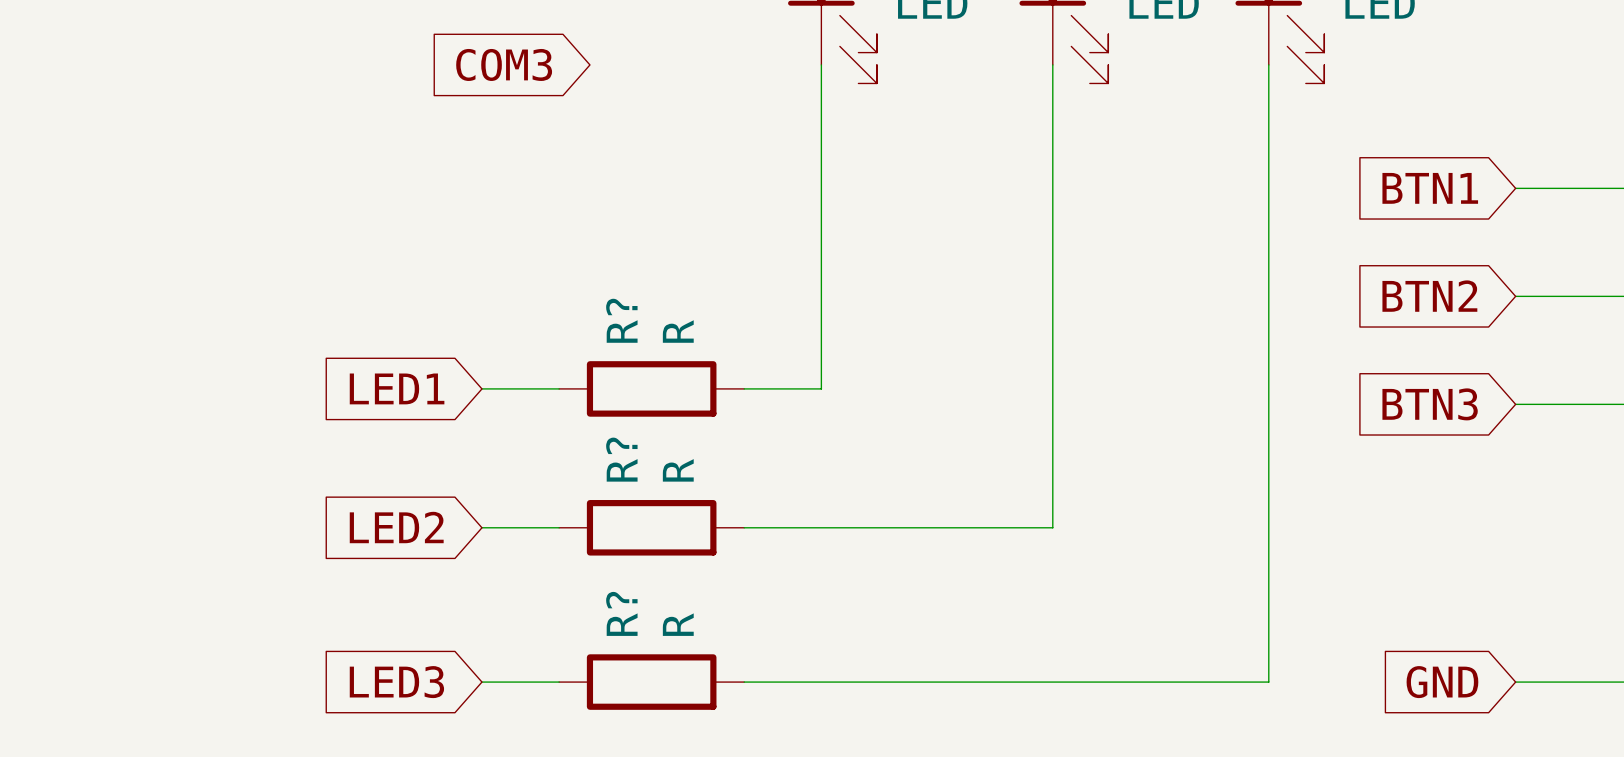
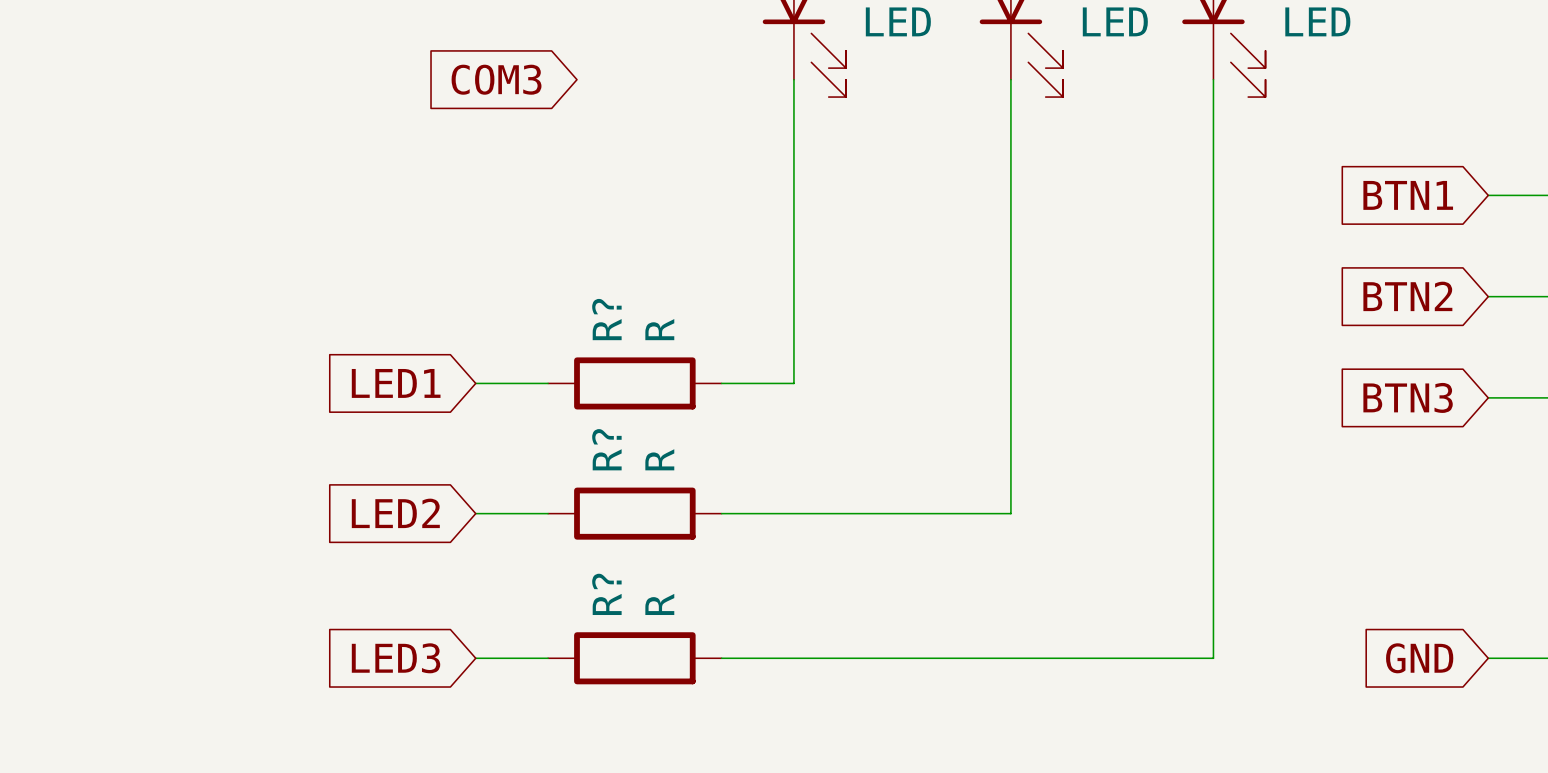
global label position: BTN1 (1430, 188) -> BTN1 (1408, 195)
wire: (1515, 188) (1561, 188) -> none
global label position: BTN2 (1429, 296) -> BTN2 (1407, 296)
wire: (1515, 296) (1561, 296) -> none
global label position: BTN3 (1430, 404) -> BTN3 (1408, 397)
wire: (1515, 404) (1561, 404) -> none
global label position: GND (1442, 682) -> GND (1419, 658)
wire: (1515, 682) (1561, 682) -> none

